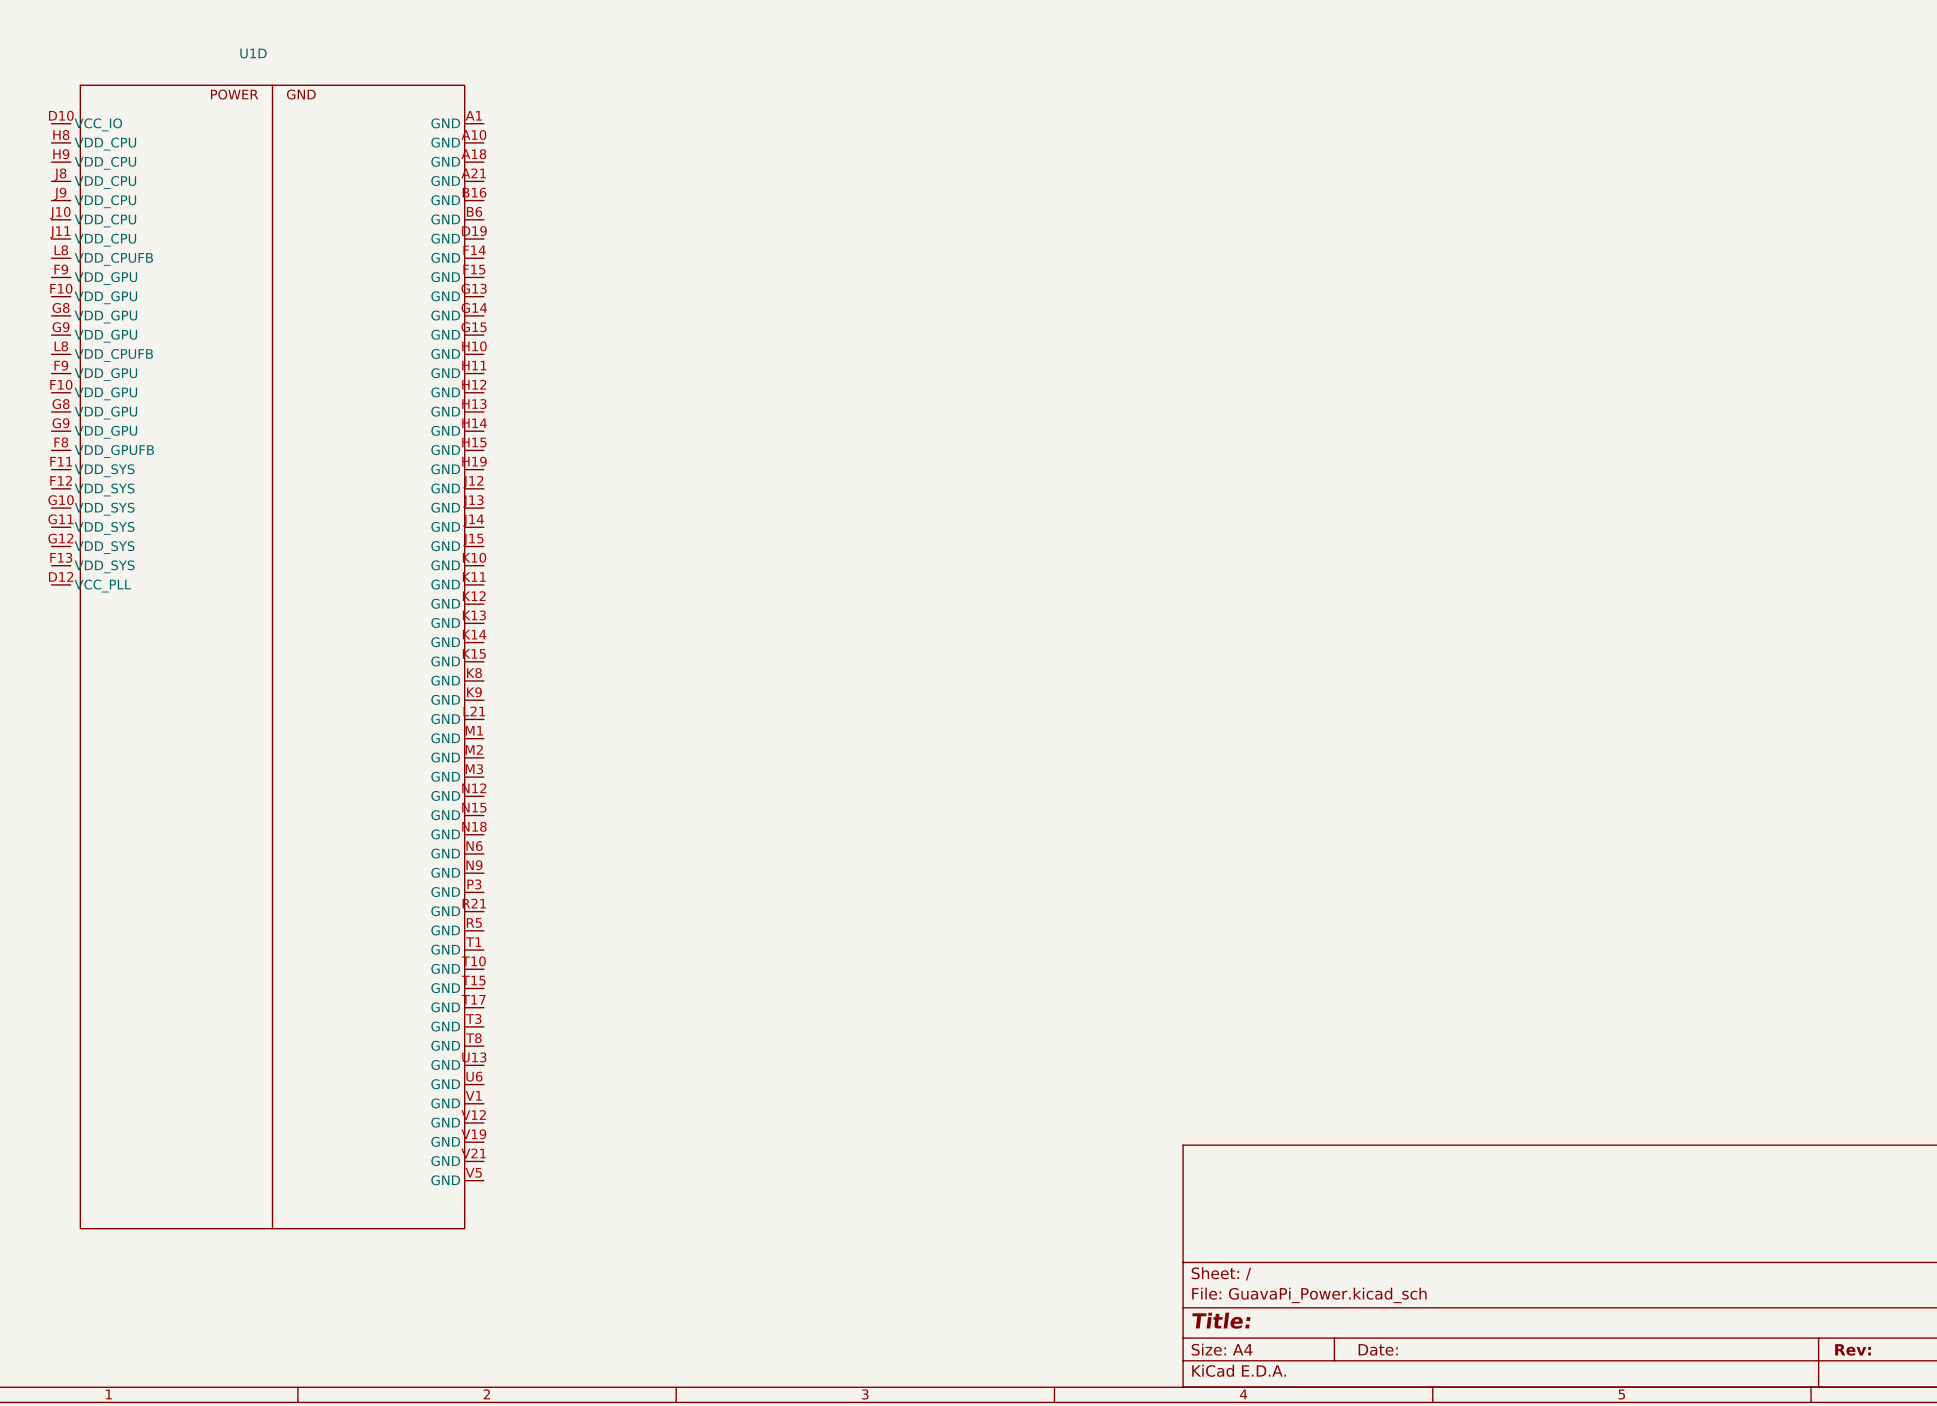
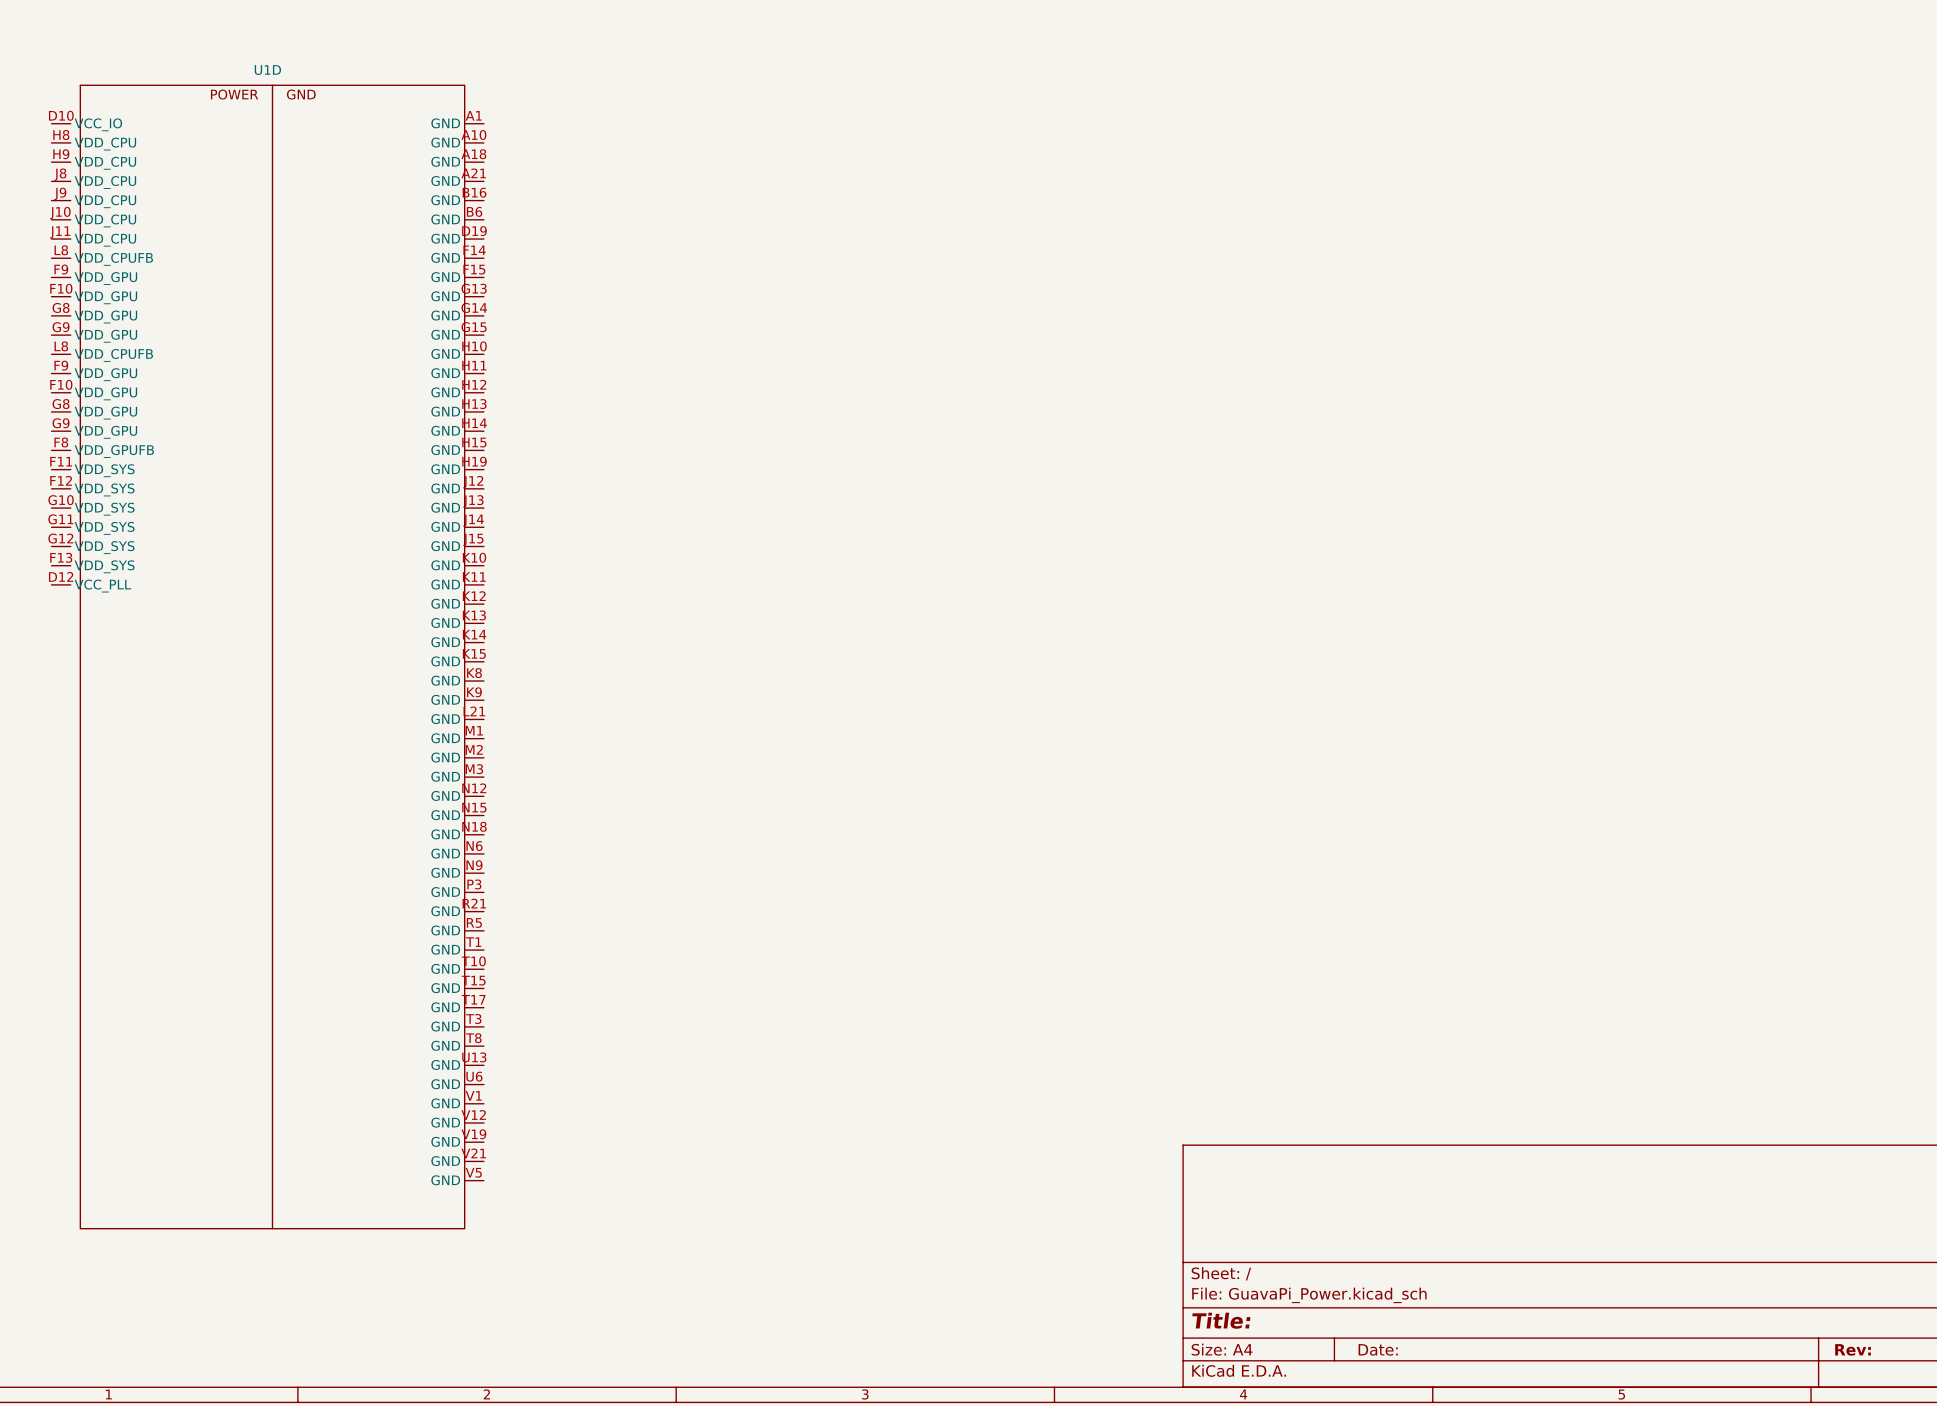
U1D name position: U1D (253, 53) -> U1D (267, 70)

